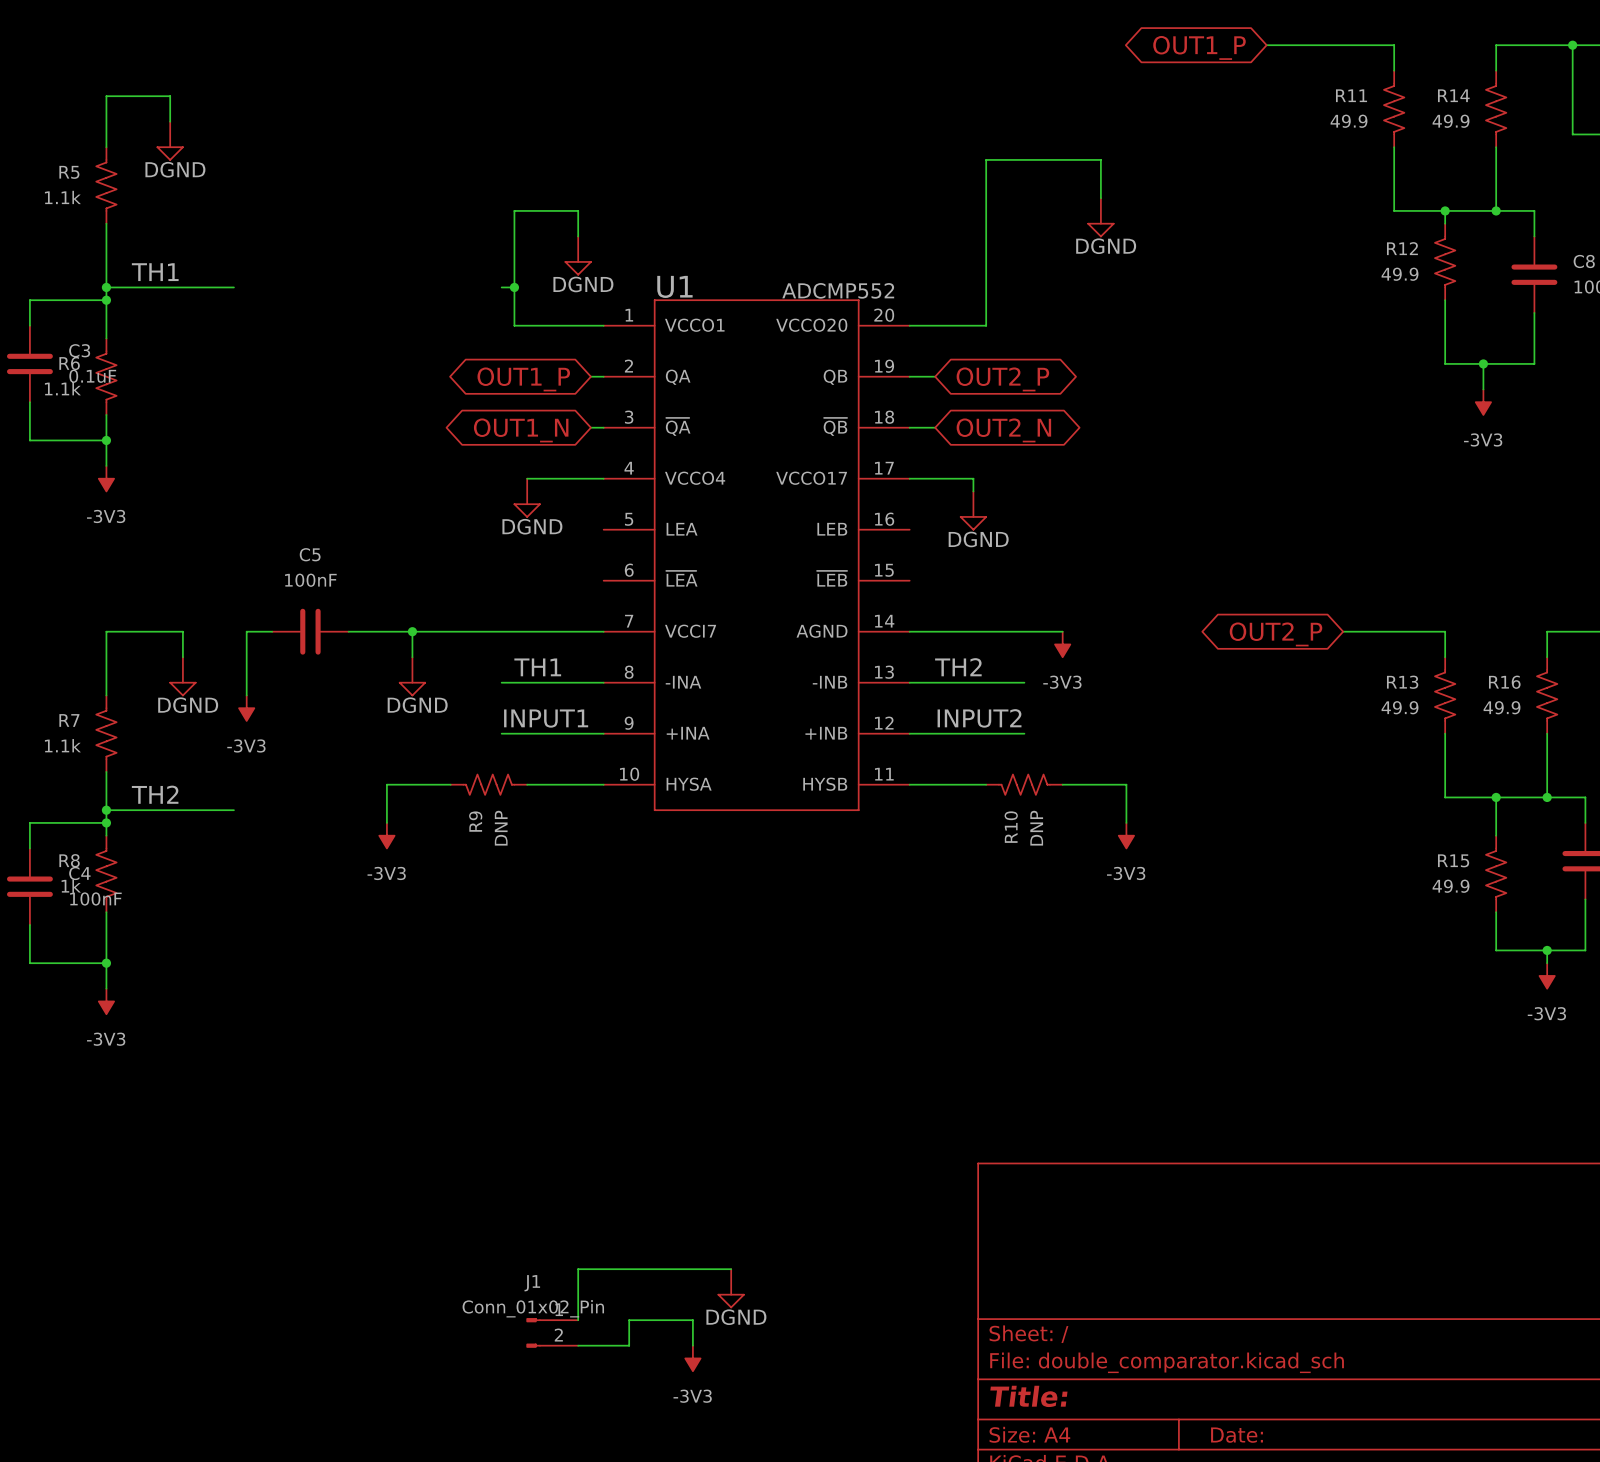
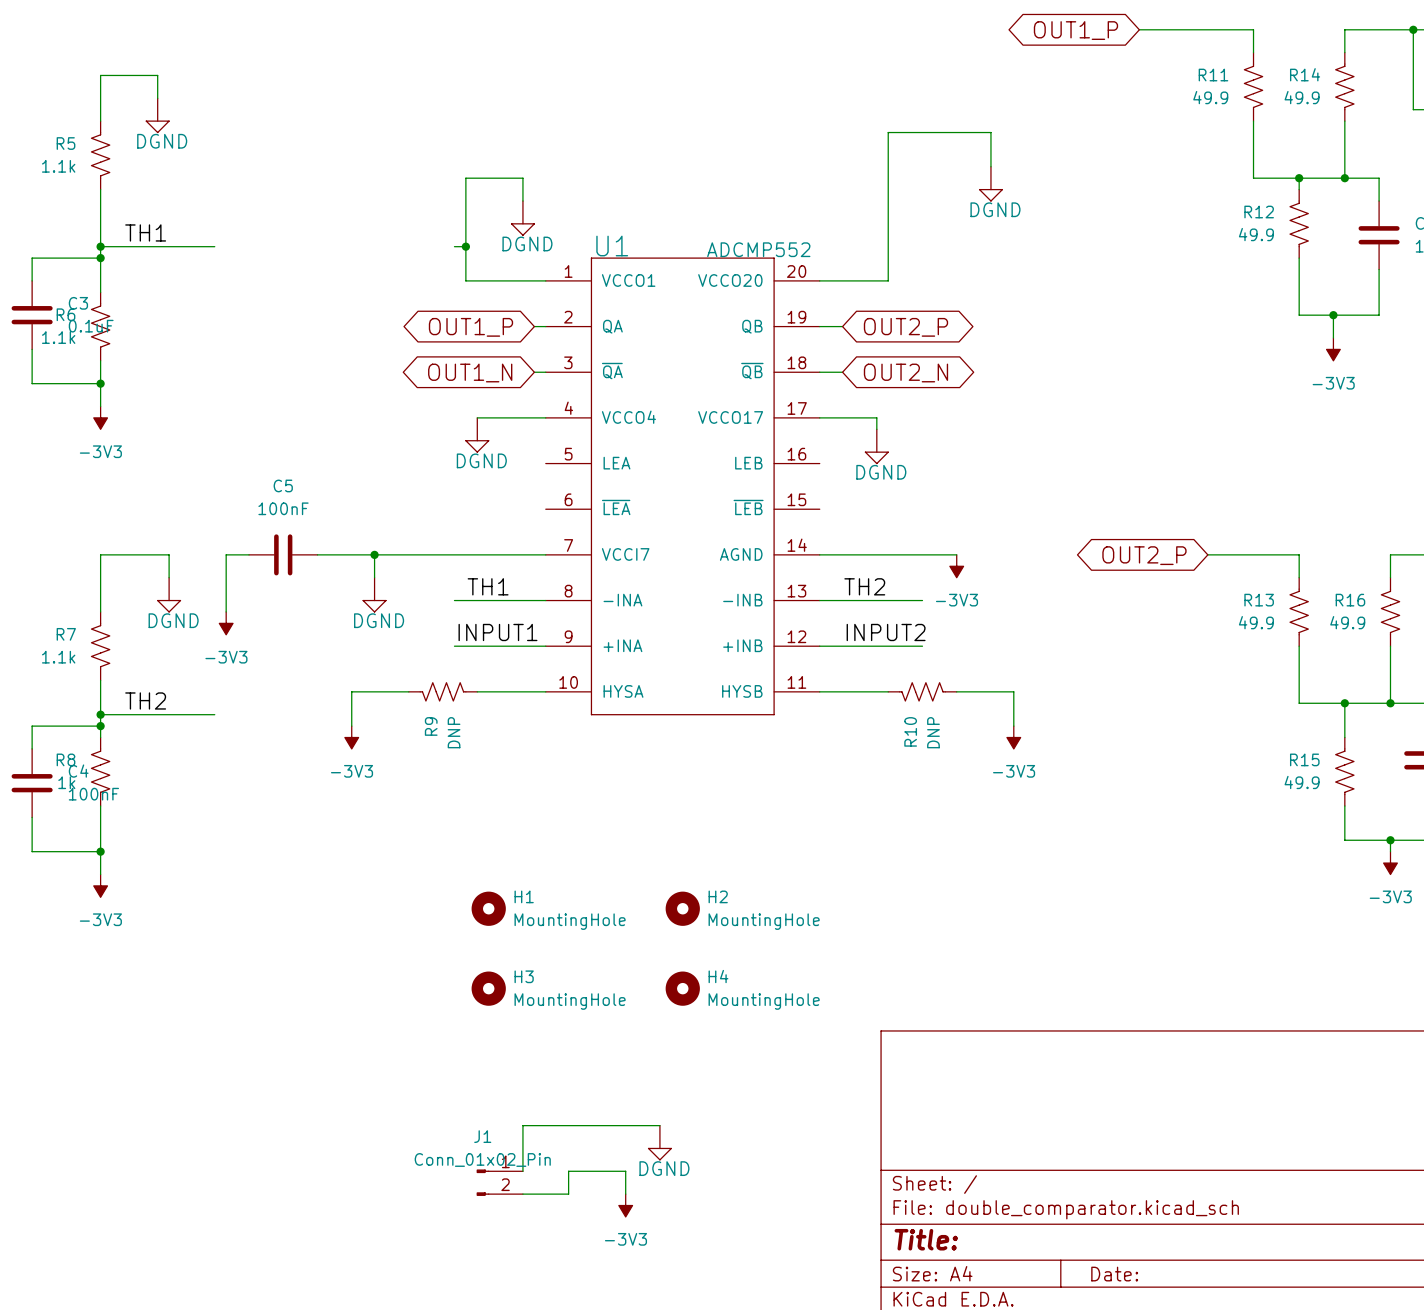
H1: none -> MountingHole (488, 908)
H2: none -> MountingHole (682, 908)
H3: none -> MountingHole (488, 988)
H4: none -> MountingHole (682, 988)

